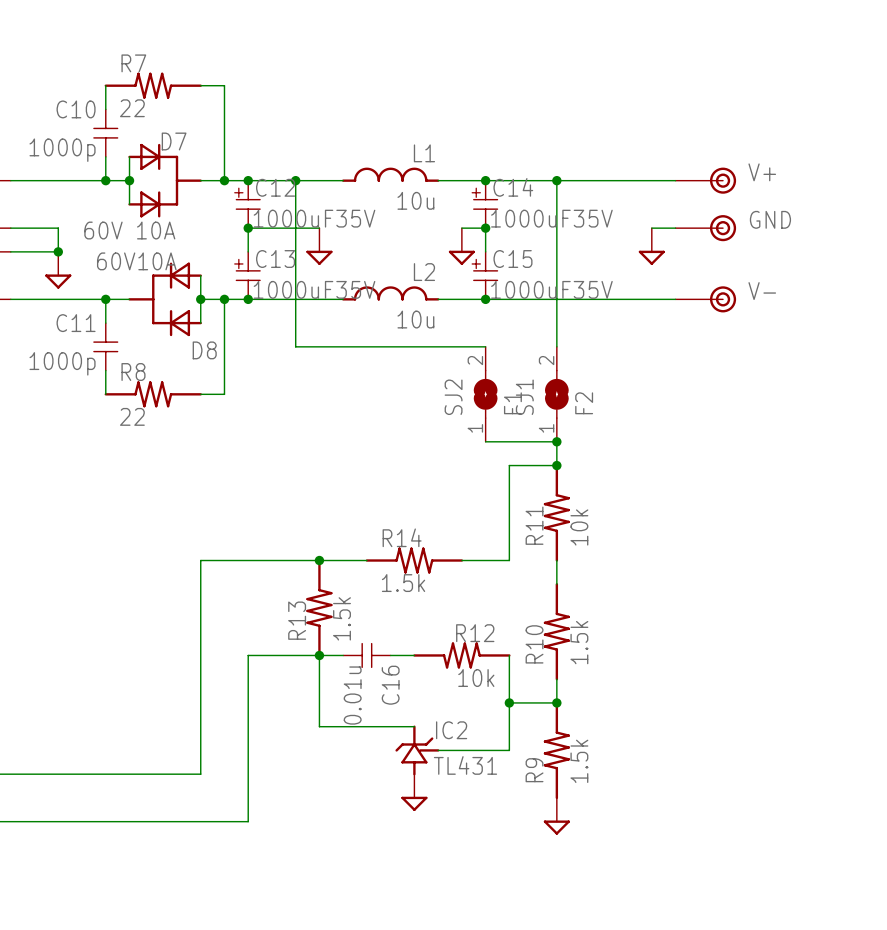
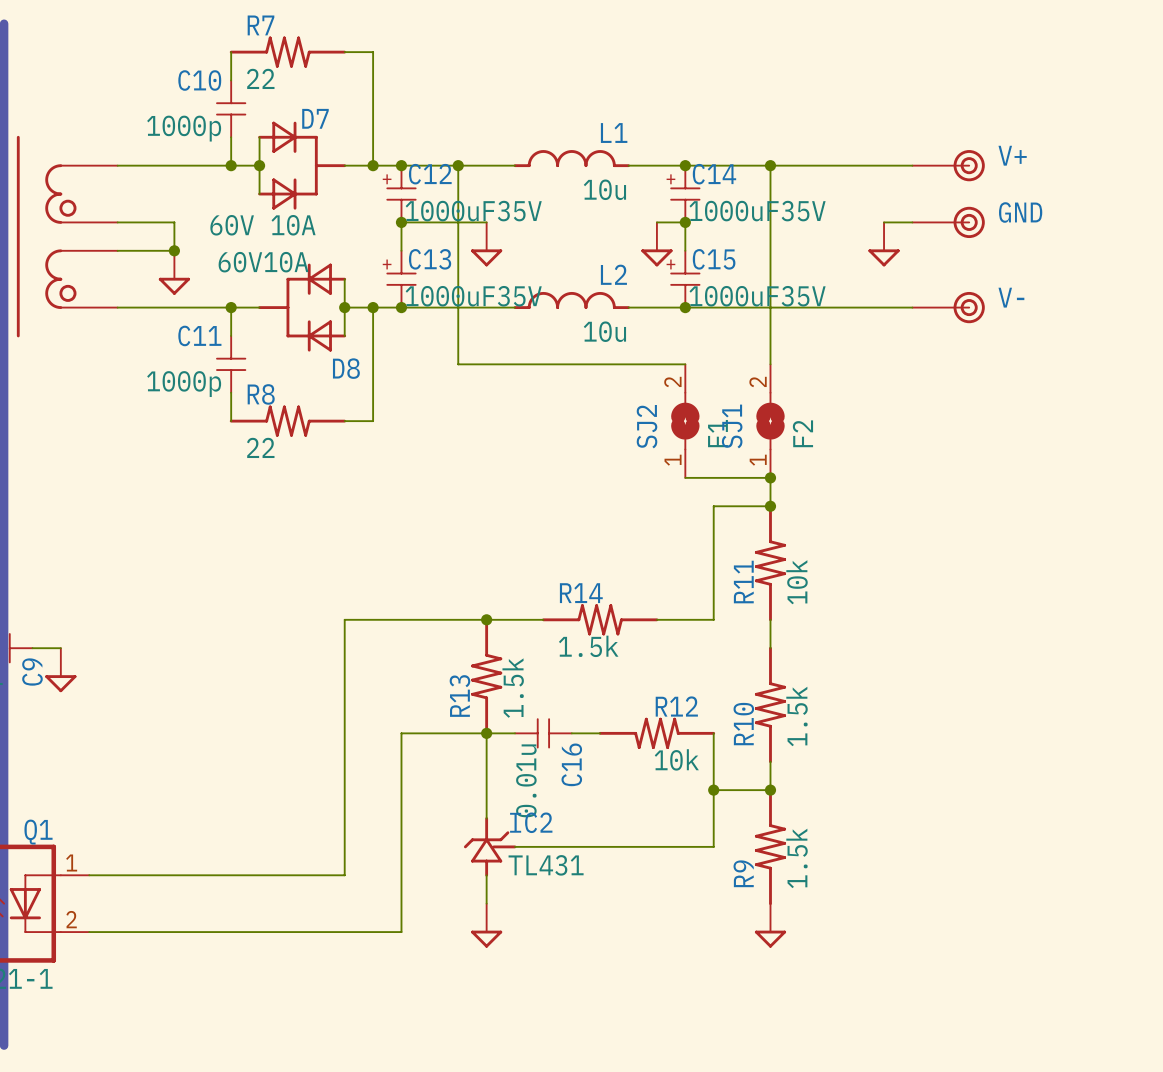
wire: (319, 726) (414, 726) -> (515, 846) (628, 846)
IC2 position: (417, 750) -> (490, 846)
wire: none -> (486, 875) (486, 903)
power symbol position: (414, 792) -> (486, 925)

